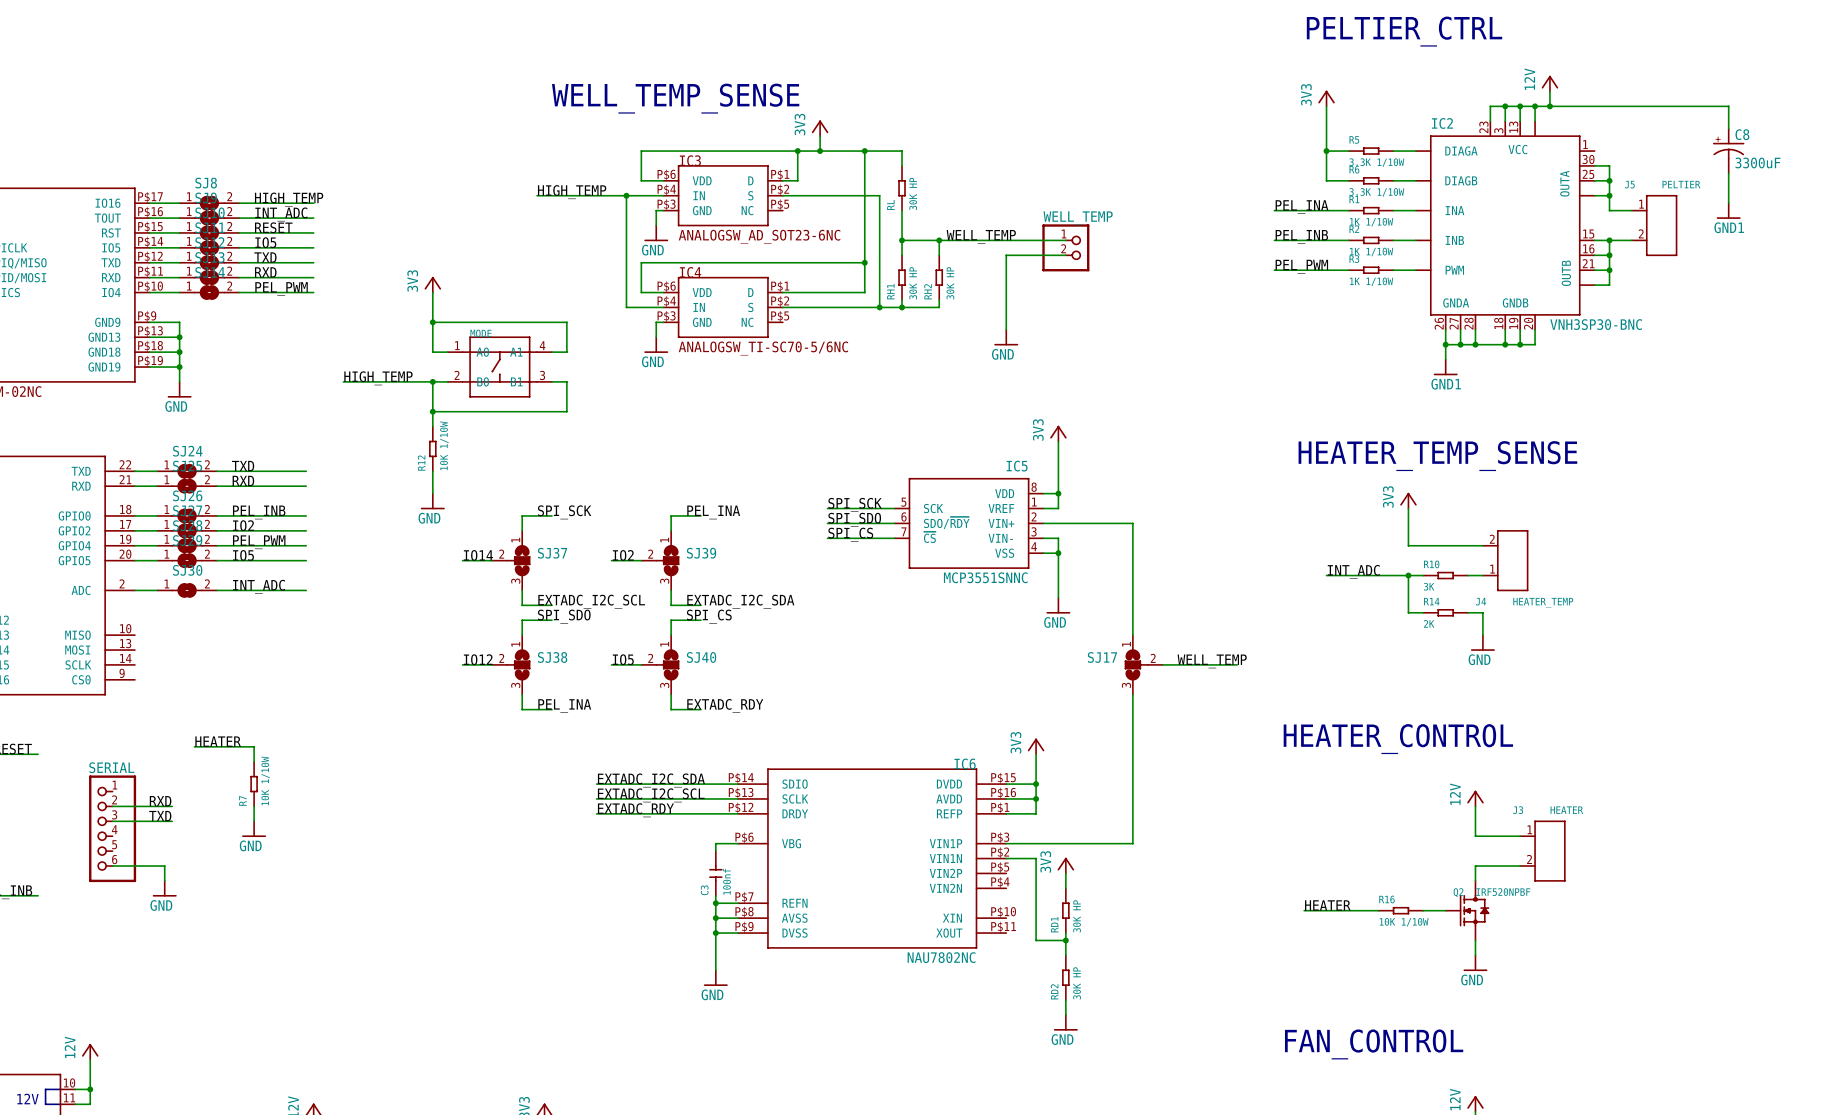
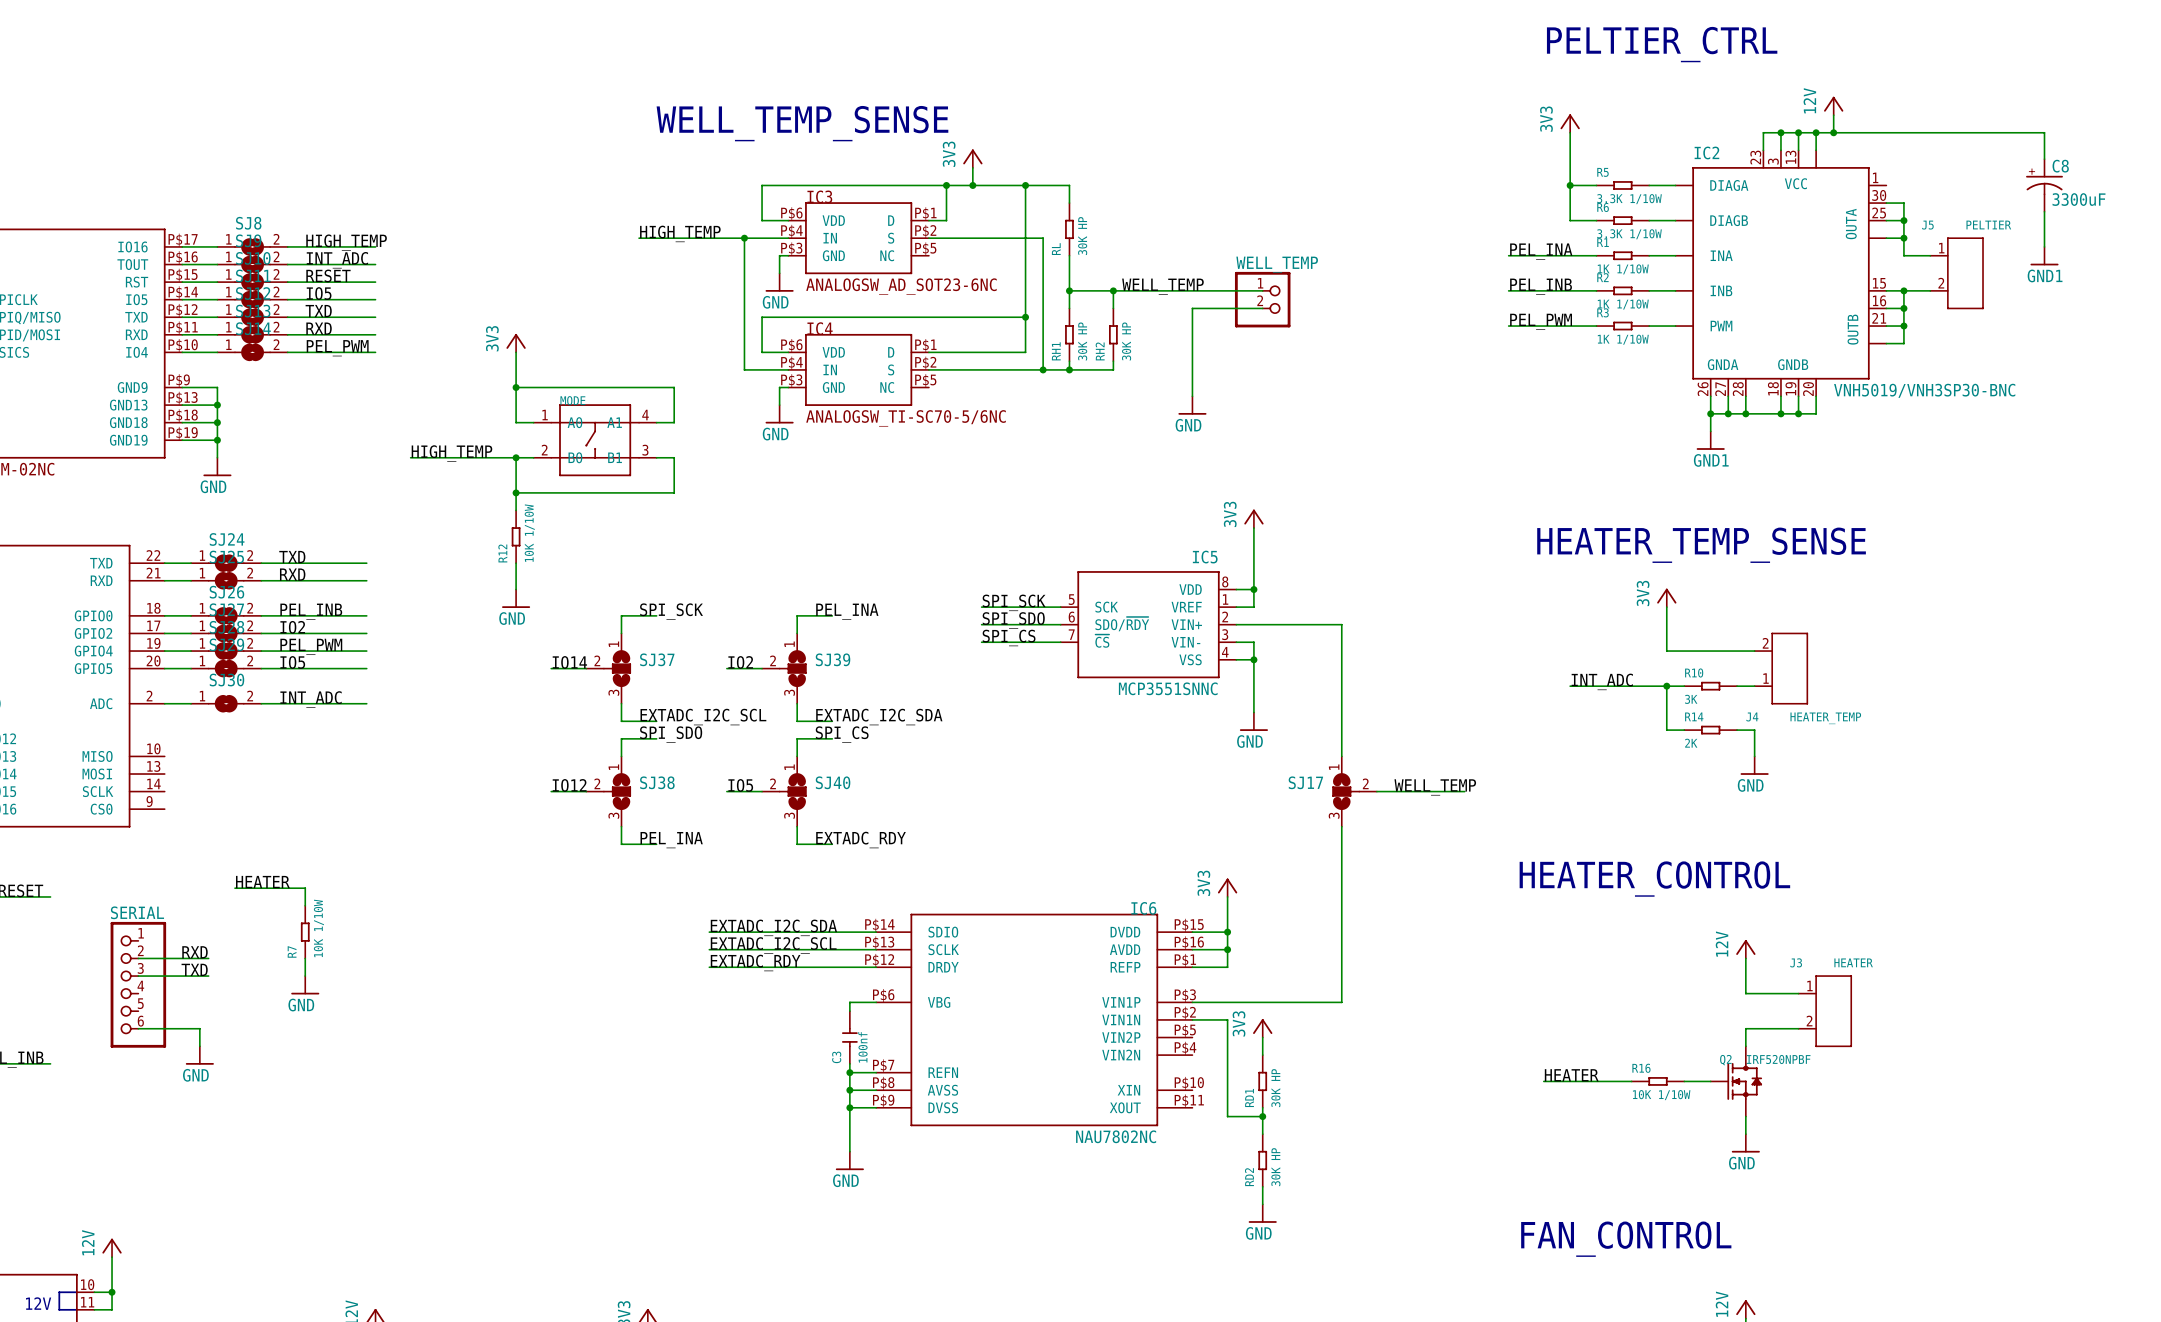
IC2 value: VNH3SP30-BNC (1596, 324) -> VNH5019/VNH3SP30-BNC (1924, 390)

